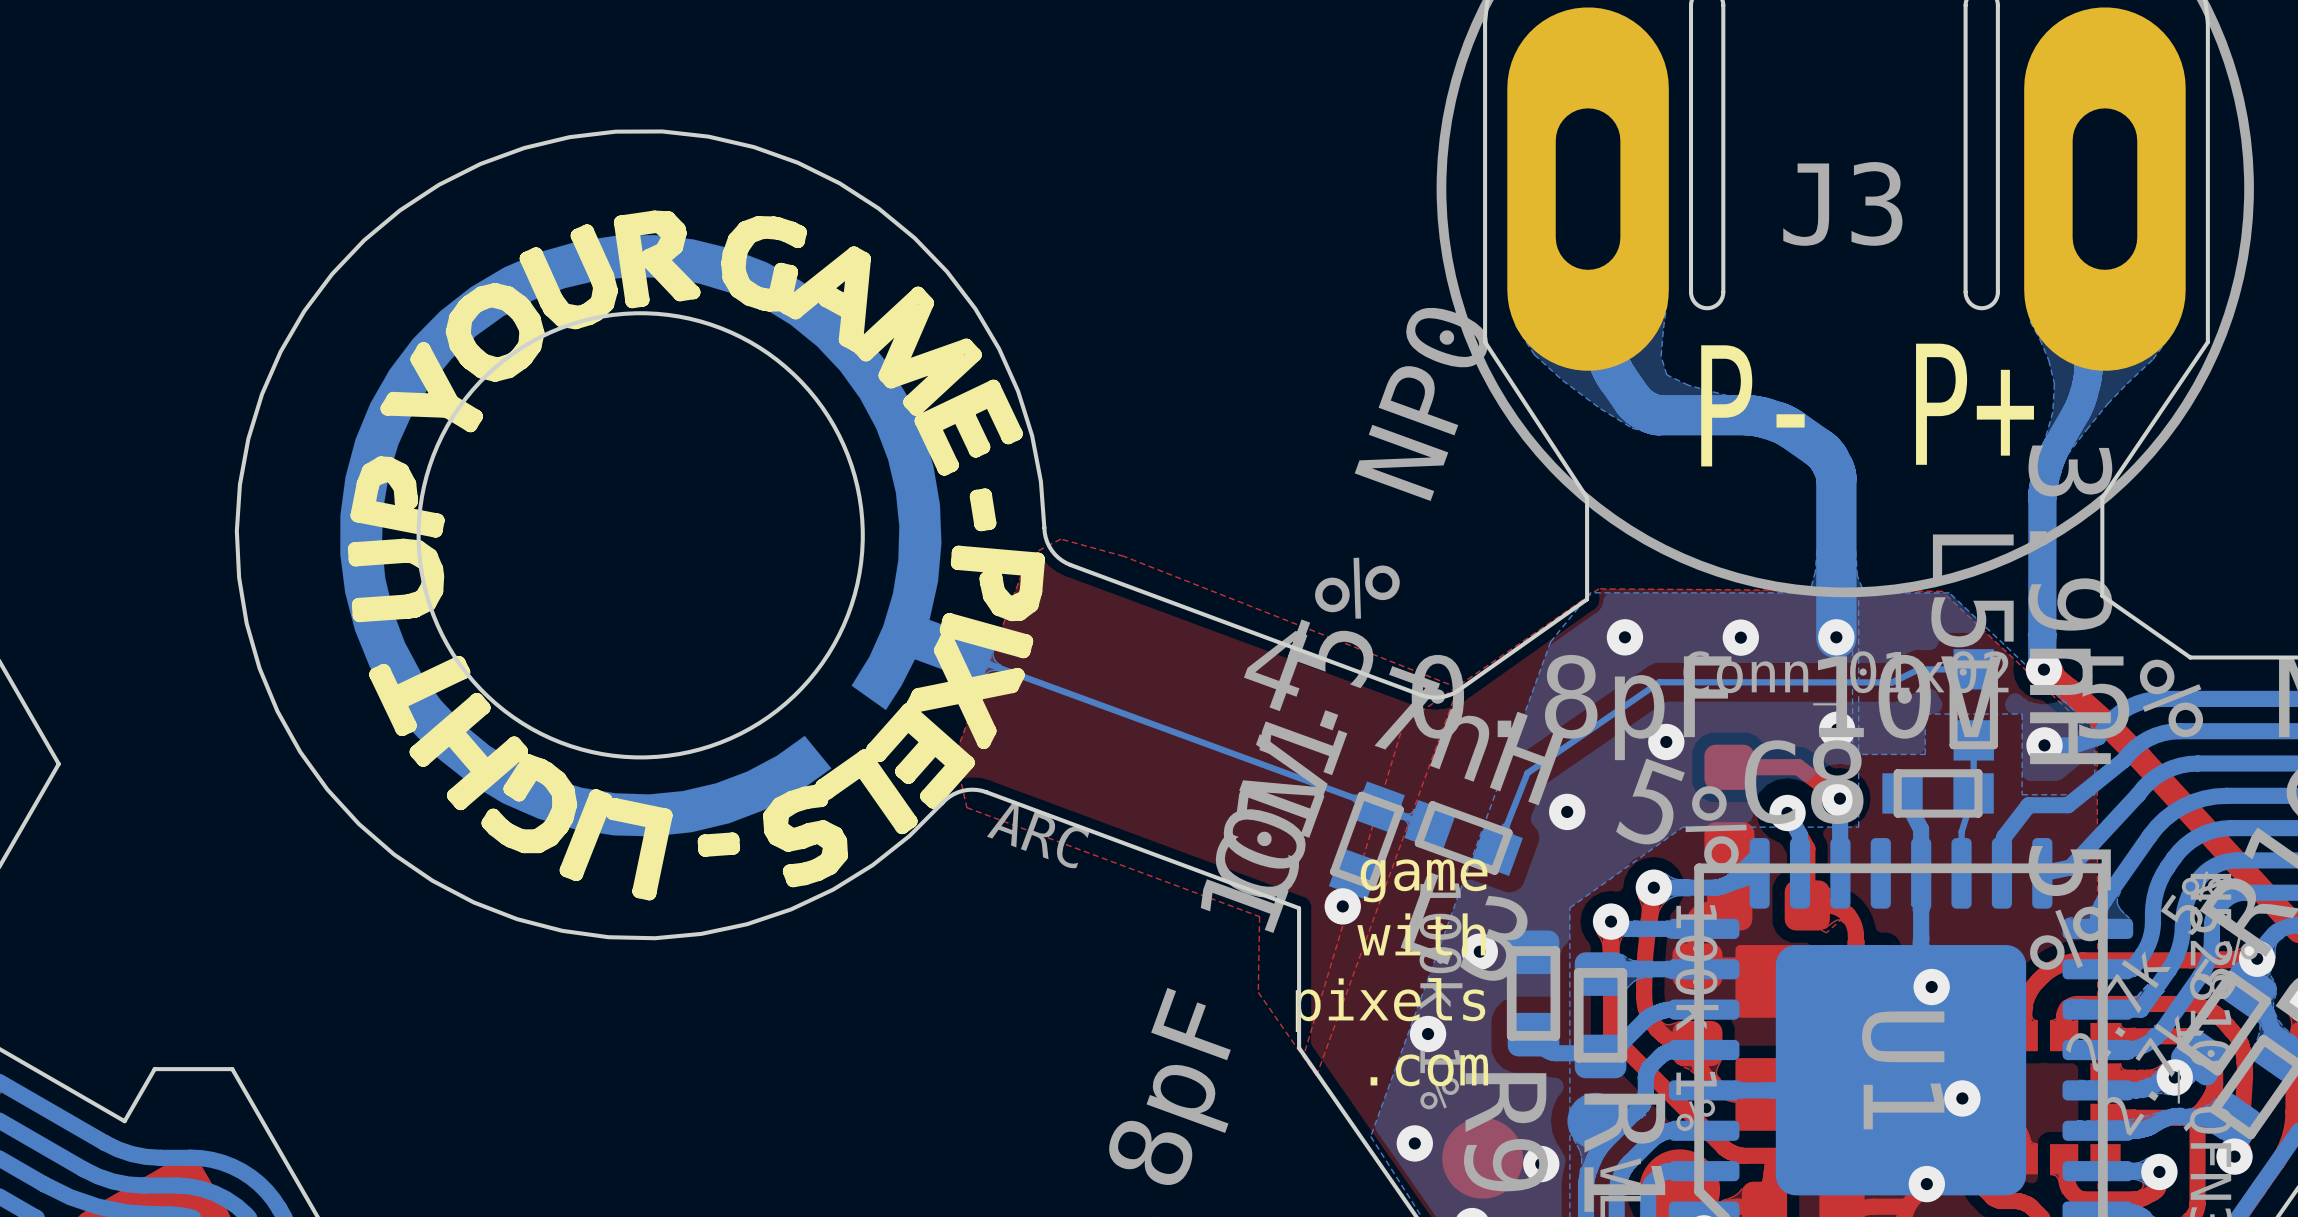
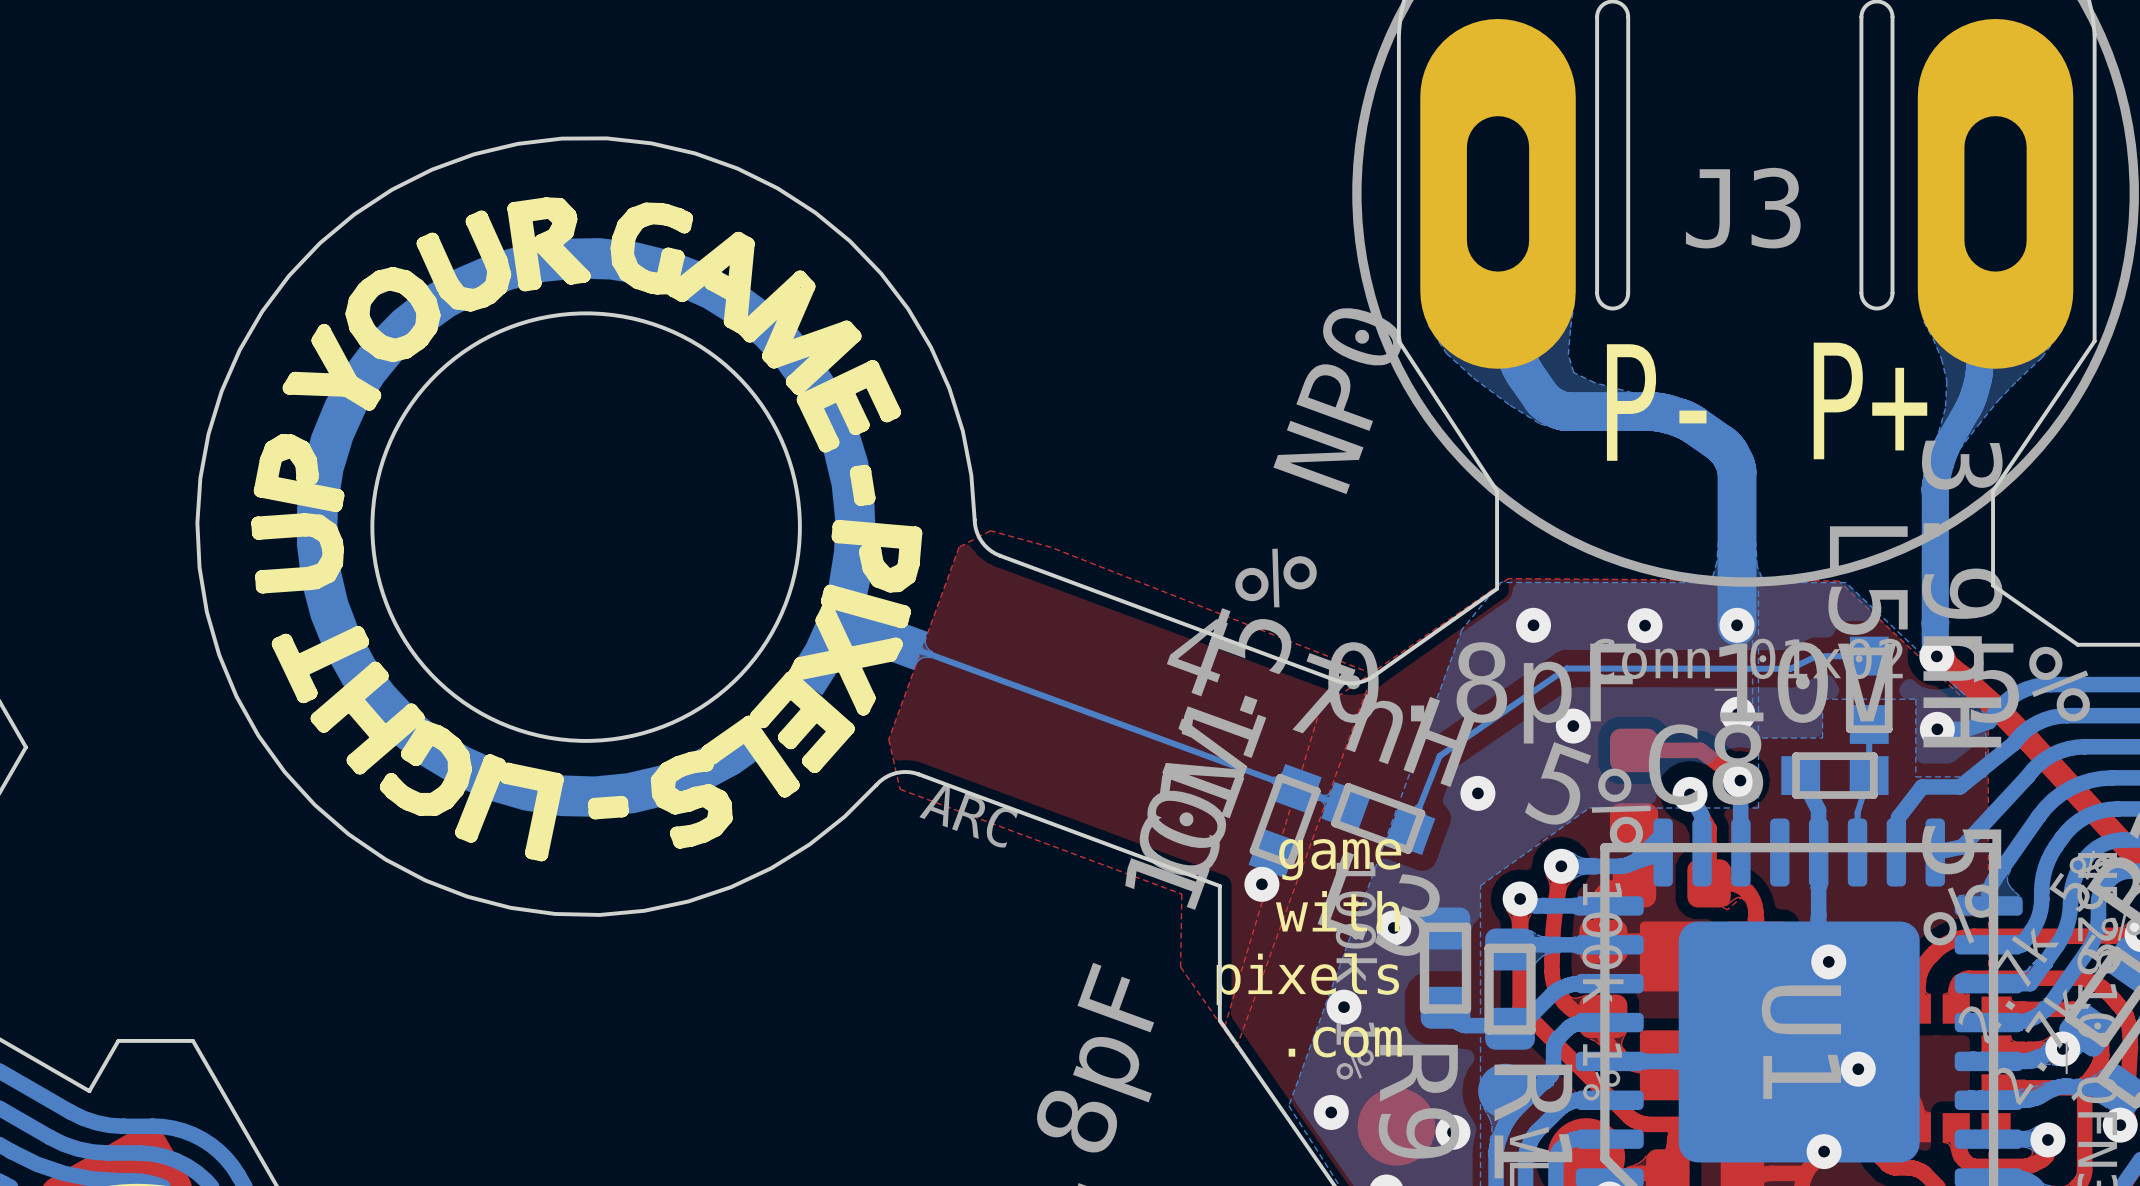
line: none -> (661, 209) (686, 218) (684, 226) (665, 218) (651, 217) (638, 222) (630, 234) (627, 254) (632, 268) (644, 276) (662, 279) (668, 254) (677, 256) (670, 287) (657, 287) (637, 282) (625, 274) (618, 262) (617, 248) (623, 224) (633, 214) (646, 209) (661, 209)
line: (654, 217) (668, 218) (678, 228) (679, 233) (676, 247) (661, 259) (693, 292) (680, 294) (649, 262) (648, 255) (662, 249) (668, 235) (658, 225) (632, 229) (642, 299) (632, 301) (620, 222) (654, 217) -> (546, 204) (559, 204) (569, 214) (570, 219) (567, 232) (552, 244) (583, 275) (570, 277) (541, 247) (541, 240) (553, 235) (560, 221) (550, 212) (525, 215) (534, 283) (525, 284) (514, 208) (546, 204)
line: (758, 223) (744, 228) (734, 239) (728, 263) (729, 277) (737, 290) (748, 298) (769, 304) (783, 304) (791, 272) (781, 269) (775, 296) (756, 293) (743, 284) (738, 270) (739, 255) (741, 248) (750, 236) (763, 231) (778, 232) (797, 241) (799, 232) (778, 224) (758, 223) -> none
line: (587, 231) (607, 275) (610, 290) (607, 304) (589, 318) (575, 322) (561, 320) (550, 309) (526, 258) (536, 254) (556, 298) (564, 310) (578, 312) (586, 310) (597, 301) (600, 287) (577, 235) (587, 231) -> (481, 217) (500, 260) (504, 274) (500, 287) (484, 300) (470, 304) (456, 302) (446, 292) (423, 243) (432, 239) (451, 282) (460, 293) (473, 295) (480, 293) (491, 285) (494, 271) (472, 221) (481, 217)
line: (853, 253) (863, 258) (855, 345) (845, 339) (848, 312) (825, 300) (832, 294) (849, 303) (853, 264) (795, 312) (786, 307) (853, 253) -> (738, 238) (747, 243) (740, 326) (730, 321) (733, 295) (711, 283) (717, 277) (734, 286) (738, 249) (682, 295) (673, 290) (738, 238)
line: (495, 289) (480, 293) (464, 305) (456, 317) (452, 331) (456, 346) (469, 362) (481, 371) (495, 374) (509, 371) (525, 358) (534, 346) (537, 333) (533, 318) (521, 302) (509, 293) (495, 289) -> (393, 273) (379, 277) (363, 288) (355, 300) (352, 313) (355, 327) (367, 343) (379, 352) (393, 355) (406, 351) (422, 339) (430, 328) (433, 315) (430, 301) (418, 285) (406, 277) (393, 273)
line: (918, 293) (927, 303) (898, 369) (966, 345) (974, 354) (916, 408) (910, 402) (958, 357) (891, 381) (885, 375) (913, 310) (865, 354) (859, 347) (918, 293) -> (800, 277) (808, 286) (780, 350) (846, 327) (854, 336) (798, 388) (792, 381) (838, 339) (774, 361) (768, 356) (796, 293) (749, 335) (743, 329) (800, 277)
line: (491, 300) (473, 308) (465, 319) (463, 334) (473, 351) (484, 360) (497, 364) (511, 360) (516, 355) (525, 344) (526, 330) (519, 317) (505, 303) (491, 300) -> (389, 283) (372, 291) (364, 302) (362, 316) (372, 333) (382, 341) (395, 345) (413, 337) (422, 326) (423, 312) (416, 300) (403, 287) (389, 283)
line: (423, 349) (452, 402) (475, 416) (470, 425) (446, 410) (387, 408) (393, 398) (440, 400) (417, 359) (423, 349) -> (324, 330) (351, 381) (374, 395) (369, 403) (346, 390) (289, 387) (295, 378) (340, 380) (318, 340) (324, 330)
line: (993, 386) (1015, 433) (1008, 437) (990, 399) (966, 411) (983, 447) (975, 450) (958, 414) (933, 426) (951, 465) (944, 468) (921, 420) (993, 386) -> (872, 366) (894, 412) (886, 415) (869, 379) (846, 390) (862, 424) (855, 428) (839, 393) (815, 405) (832, 442) (825, 445) (803, 399) (872, 366)
line: none -> (283, 440) (271, 447) (266, 460) (260, 490) (335, 505) (337, 495) (270, 482) (276, 456) (289, 451) (293, 452) (302, 464) (303, 478) (311, 477) (310, 460) (303, 447) (291, 441) (283, 440)
line: (389, 463) (380, 463) (368, 470) (363, 483) (357, 515) (435, 530) (437, 520) (367, 506) (374, 479) (387, 474) (392, 476) (400, 488) (401, 502) (410, 501) (409, 483) (402, 470) (389, 463) -> none
line: (985, 495) (976, 496) (981, 524) (989, 522) (985, 495) -> (864, 471) (856, 472) (860, 499) (868, 498) (864, 471)
line: (403, 545) (418, 547) (430, 555) (437, 576) (436, 591) (429, 603) (415, 610) (359, 615) (358, 604) (407, 601) (421, 597) (428, 584) (428, 577) (424, 563) (412, 556) (355, 559) (354, 549) (403, 545) -> (304, 519) (319, 521) (330, 529) (337, 549) (336, 563) (329, 575) (316, 582) (262, 586) (261, 576) (308, 573) (321, 569) (328, 557) (329, 550) (325, 536) (313, 529) (258, 533) (258, 523) (304, 519)
line: (958, 552) (957, 562) (1028, 569) (1025, 596) (1012, 603) (1007, 602) (998, 591) (995, 577) (986, 578) (990, 596) (998, 609) (1011, 614) (1020, 613) (1031, 605) (1035, 591) (1038, 559) (958, 552) -> (839, 526) (838, 536) (906, 542) (903, 569) (890, 575) (886, 574) (877, 563) (874, 550) (866, 551) (869, 568) (877, 580) (890, 585) (898, 585) (909, 577) (912, 564) (915, 533) (839, 526)
line: (949, 620) (1026, 641) (1023, 651) (946, 629) (949, 620) -> (830, 591) (904, 611) (901, 621) (827, 601) (830, 591)
line: (946, 639) (968, 685) (1017, 675) (1012, 686) (972, 694) (989, 730) (983, 742) (962, 696) (912, 706) (918, 695) (958, 686) (941, 650) (946, 639) -> (827, 609) (848, 653) (896, 644) (890, 655) (852, 662) (868, 698) (863, 708) (842, 664) (795, 674) (800, 663) (838, 655) (822, 620) (827, 609)
line: (458, 663) (394, 693) (383, 671) (376, 674) (402, 729) (409, 725) (398, 702) (463, 672) (458, 663) -> (358, 632) (296, 662) (285, 640) (278, 643) (303, 696) (310, 692) (300, 671) (362, 641) (358, 632)
line: (476, 700) (483, 707) (456, 731) (486, 767) (514, 743) (520, 751) (460, 803) (453, 795) (480, 772) (449, 736) (423, 759) (416, 751) (476, 700) -> (375, 668) (381, 675) (355, 698) (385, 732) (411, 710) (417, 717) (359, 767) (353, 760) (378, 738) (349, 703) (323, 725) (317, 718) (375, 668)
line: (908, 709) (873, 749) (879, 755) (907, 723) (928, 741) (902, 771) (908, 776) (934, 747) (954, 764) (927, 796) (933, 801) (967, 762) (908, 709) -> (790, 678) (756, 716) (762, 721) (790, 690) (810, 708) (784, 737) (790, 742) (816, 713) (835, 730) (808, 760) (814, 766) (848, 728) (790, 678)
line: (864, 756) (910, 821) (902, 827) (861, 768) (827, 792) (822, 785) (864, 756) -> (748, 722) (792, 785) (784, 790) (745, 734) (712, 757) (707, 751) (748, 722)
line: (528, 761) (510, 788) (519, 794) (533, 771) (549, 781) (558, 793) (559, 808) (553, 821) (548, 827) (536, 836) (522, 836) (509, 830) (493, 815) (488, 823) (509, 840) (524, 846) (538, 846) (551, 839) (561, 827) (570, 804) (567, 790) (559, 778) (541, 765) (528, 761) -> (424, 727) (407, 753) (416, 759) (430, 737) (445, 746) (454, 758) (454, 772) (448, 785) (444, 791) (432, 799) (418, 799) (406, 793) (391, 779) (386, 786) (407, 803) (420, 809) (435, 809) (447, 802) (457, 791) (465, 769) (462, 755) (454, 743) (437, 731) (424, 727)
line: (817, 791) (821, 800) (794, 805) (782, 813) (780, 827) (792, 835) (823, 827) (835, 833) (840, 841) (840, 855) (831, 867) (818, 873) (793, 880) (789, 871) (815, 866) (827, 858) (830, 844) (818, 836) (788, 844) (775, 838) (771, 830) (770, 816) (779, 804) (791, 797) (817, 791) -> (703, 756) (706, 764) (681, 770) (669, 777) (667, 790) (679, 798) (708, 790) (721, 797) (725, 804) (725, 818) (716, 829) (704, 835) (679, 841) (676, 833) (701, 828) (713, 821) (715, 807) (704, 799) (675, 807) (662, 801) (658, 794) (657, 780) (666, 768) (678, 762) (703, 756)
line: (595, 796) (566, 870) (576, 874) (605, 800) (595, 796) -> (490, 761) (461, 832) (471, 835) (499, 764) (490, 761)
line: (614, 804) (613, 813) (653, 821) (639, 891) (649, 893) (665, 815) (614, 804) -> (508, 769) (506, 777) (545, 785) (531, 852) (541, 854) (557, 779) (508, 769)
line: (732, 839) (733, 847) (705, 849) (704, 841) (732, 839) -> (621, 802) (622, 810) (595, 812) (594, 804) (621, 802)

